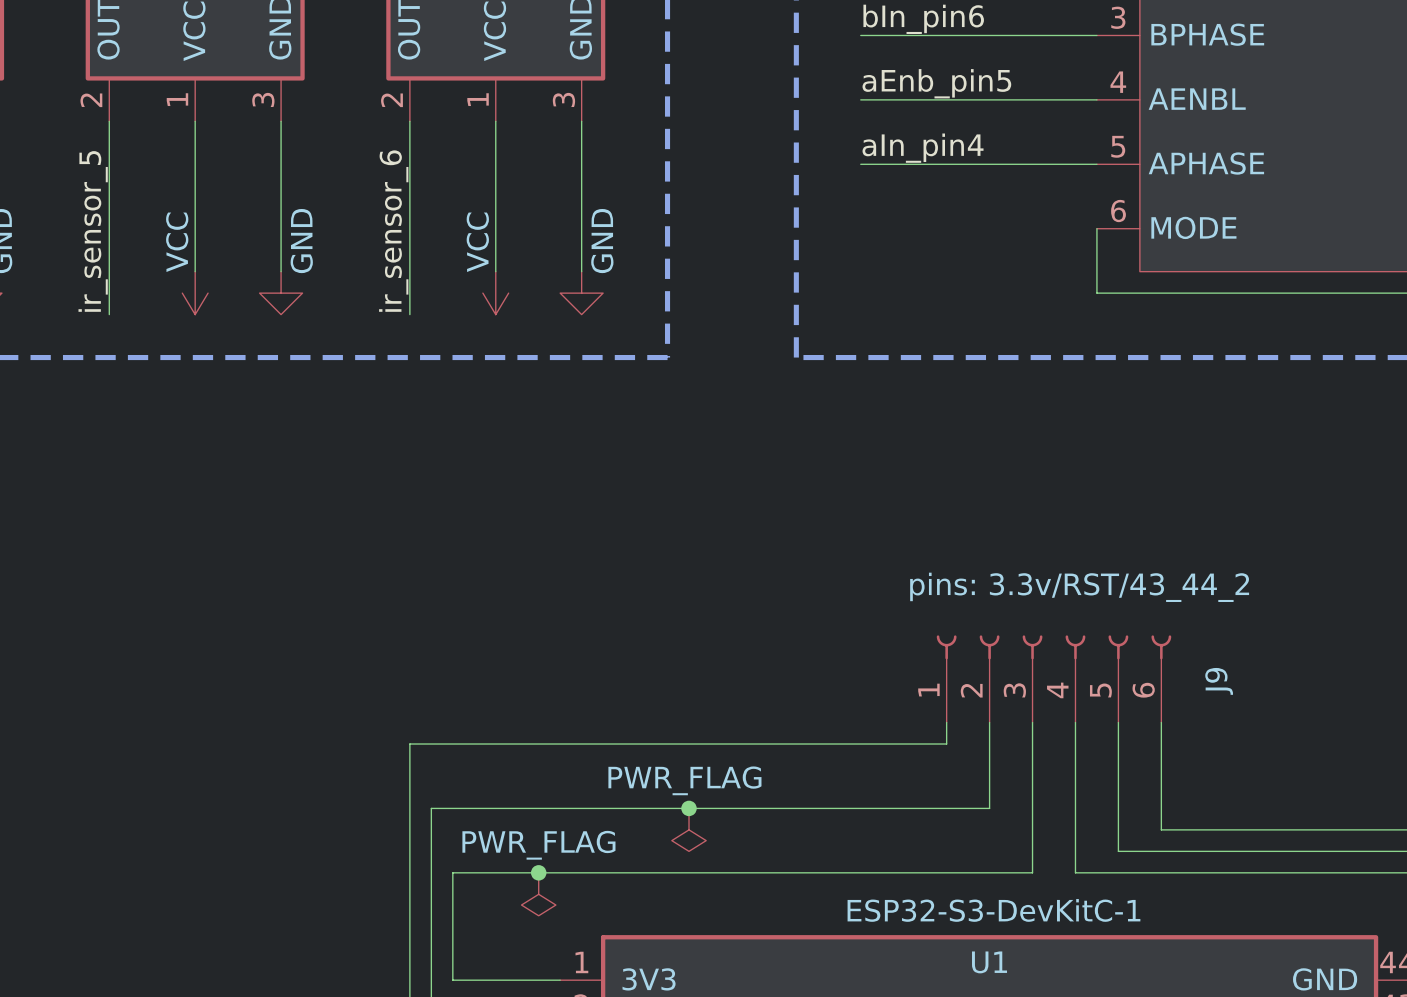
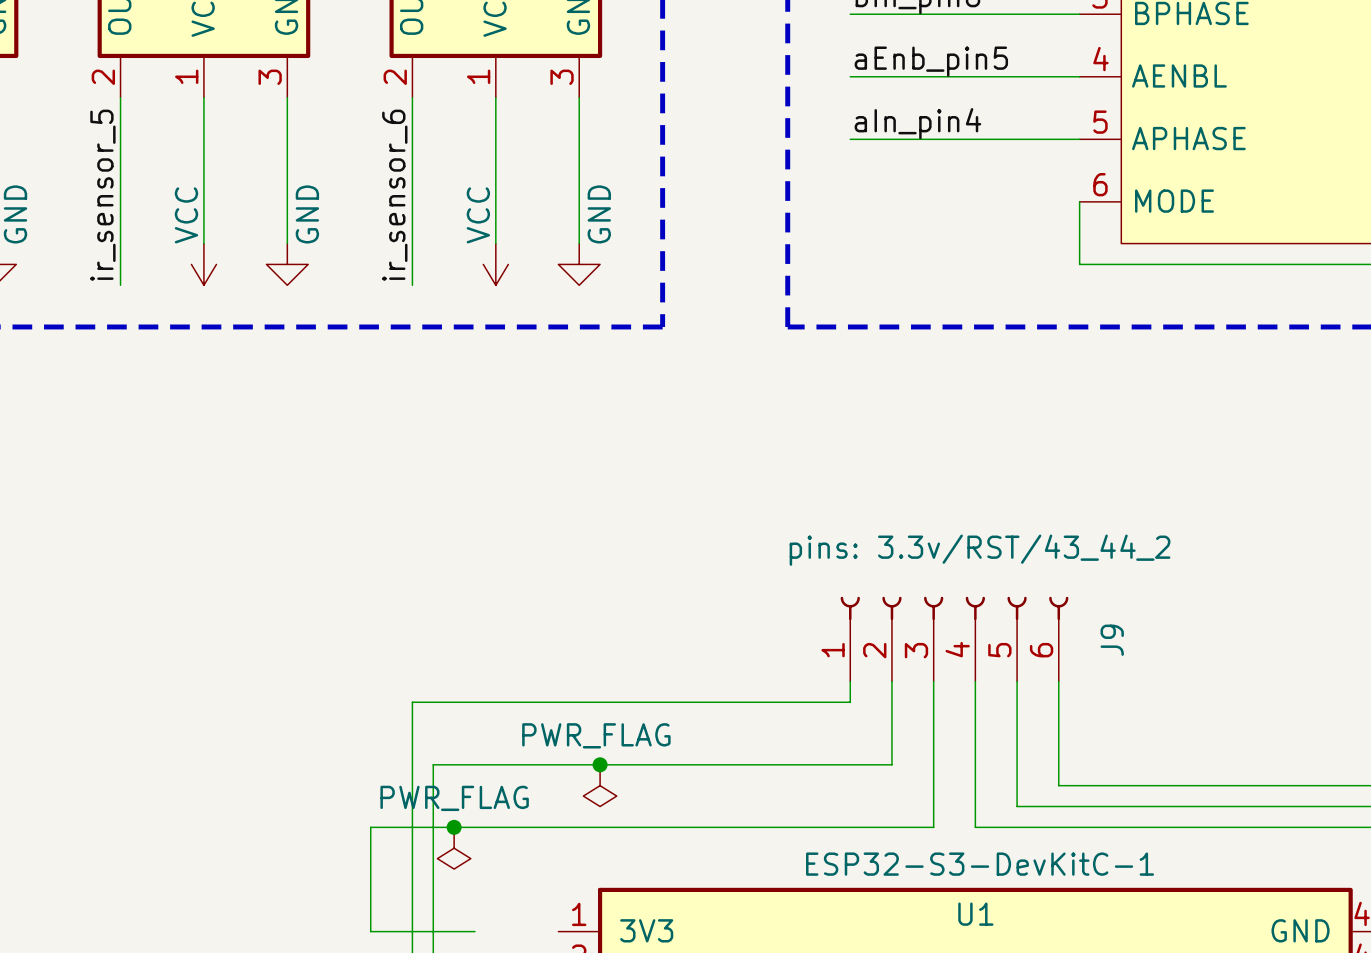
J9 position: (1054, 678) -> (954, 639)
wire: (1118, 722) (1118, 851) -> (1017, 806) (1100, 806)
wire: (1161, 722) (1161, 829) -> none
wire: (860, 744) (946, 744) -> (850, 702) (850, 681)
wire: none -> (933, 702) (933, 827)
junction: none -> (600, 764)
junction: (689, 808) -> none
wire: (903, 808) (989, 808) -> (891, 764) (891, 681)
power symbol: none -> PWR_FLAG (600, 785)
power symbol: PWR_FLAG (689, 829) -> none
wire: (1075, 829) (1075, 872) -> (1058, 785) (1142, 785)
wire: (1032, 851) (1032, 872) -> (1058, 827) (1017, 827)
wire: (452, 872) (452, 980) -> (454, 827) (370, 827) (370, 931) (454, 931)
junction: none -> (454, 827)
junction: (538, 872) -> none
wire: (946, 872) (989, 872) -> (975, 764) (975, 827)
power symbol: none -> PWR_FLAG (454, 848)
power symbol: PWR_FLAG (538, 894) -> none
wire: (474, 980) (560, 980) -> none

